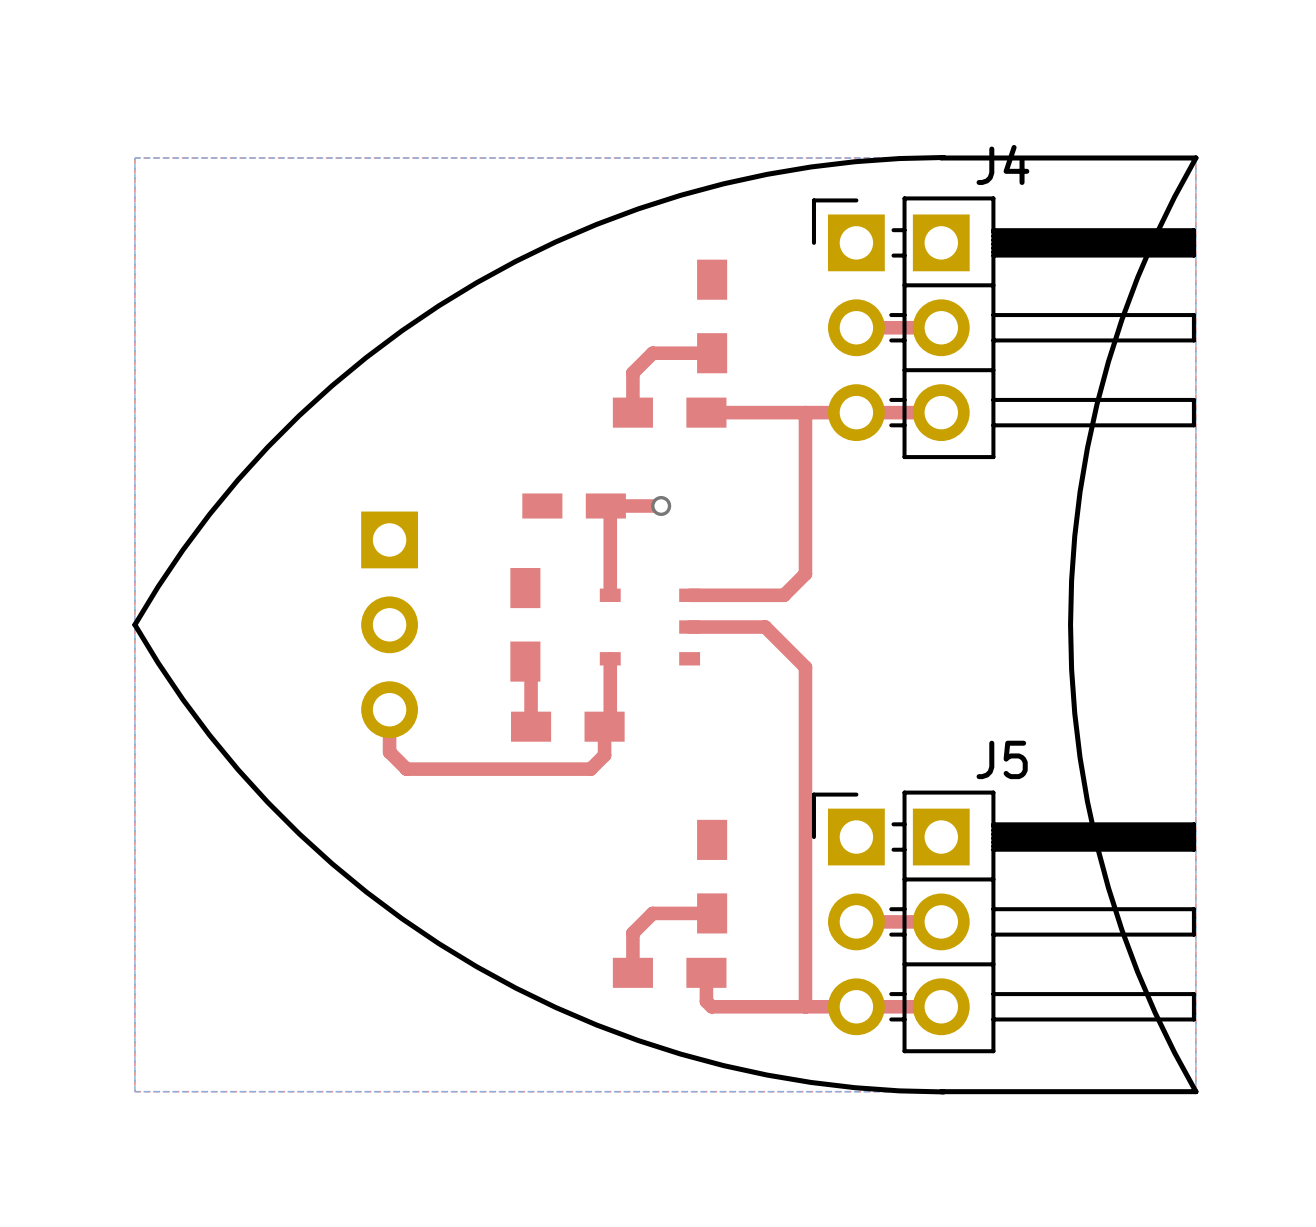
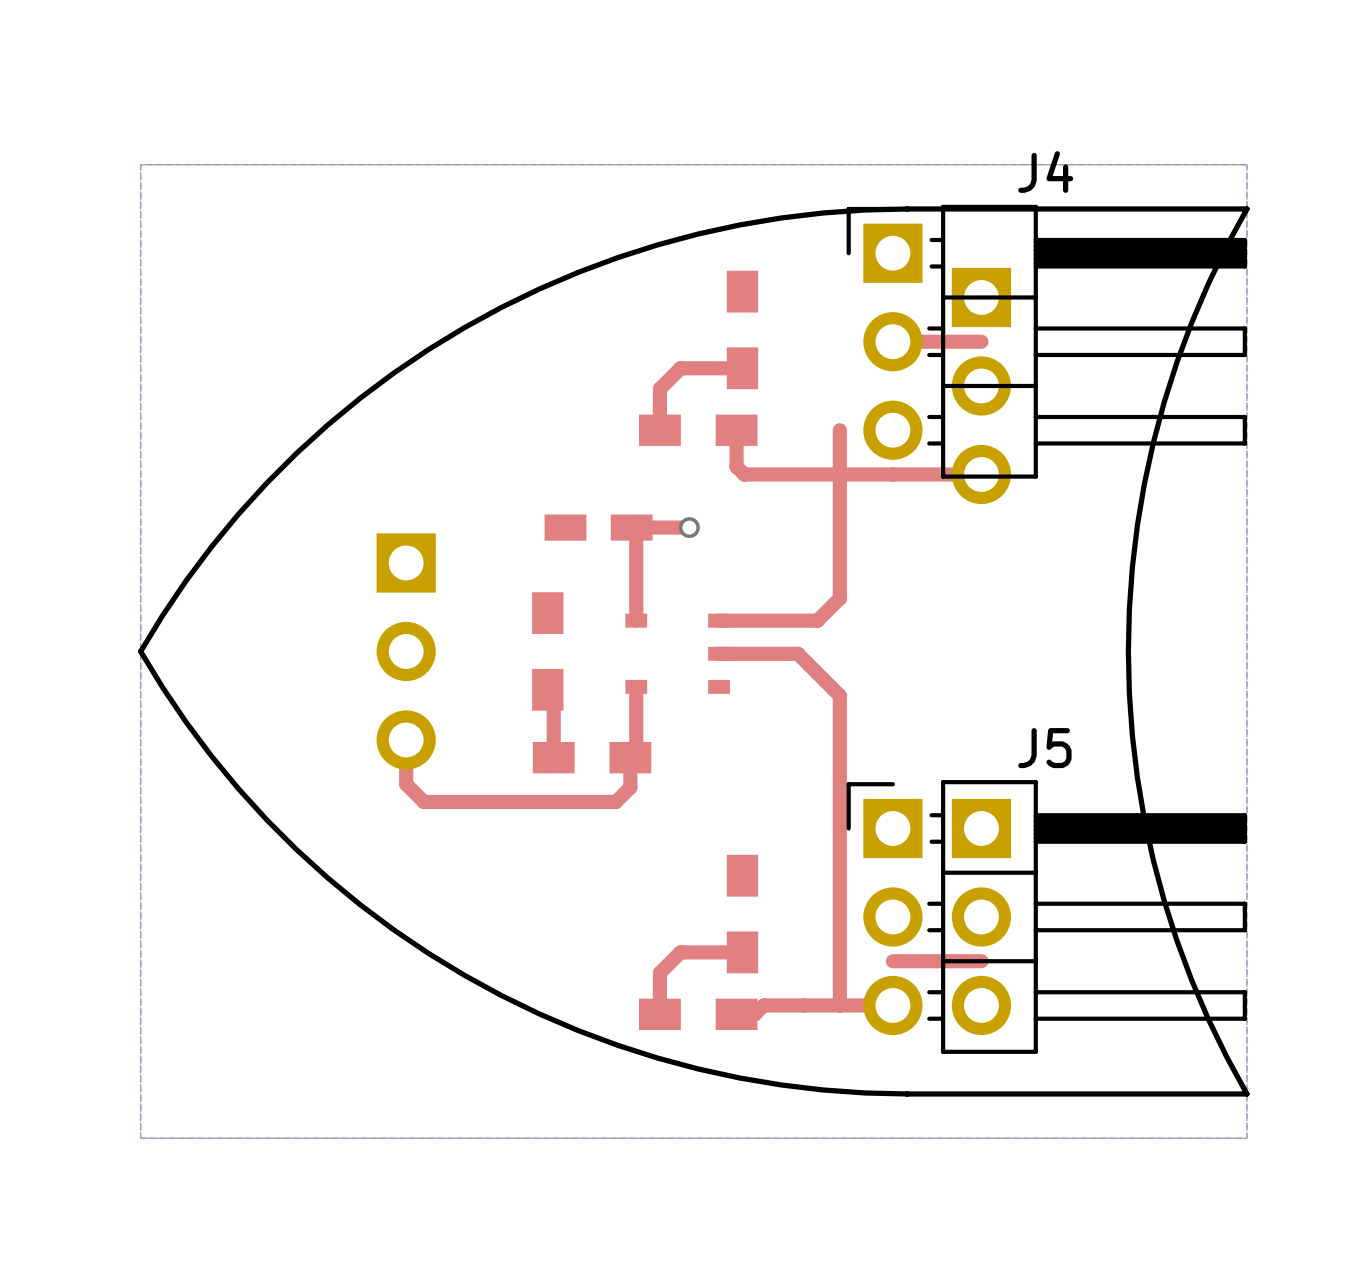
board edge: (941, 157) (1195, 157) (1174, 196) (1137, 277) (1108, 361) (1096, 404) (1080, 491) (1071, 580) (1070, 624) (1071, 669) (1080, 757) (1087, 801) (1108, 887) (1137, 971) (1174, 1052) (1195, 1091) (941, 1091) -> none
board edge: (943, 157) (899, 158) (810, 167) (723, 183) (680, 195) (596, 224) (555, 241) (476, 282) (401, 330) (366, 357) (299, 415) (237, 480) (209, 514) (158, 586) (134, 624) (182, 699) (209, 735) (267, 802) (299, 833) (332, 863) (402, 918) (476, 966) (515, 988) (596, 1025) (680, 1054) (767, 1075) (810, 1082) (855, 1087) (943, 1091) -> none
board edge: none -> (1246, 208) (907, 208) (822, 213) (739, 224) (698, 233) (657, 244) (578, 272) (501, 307) (428, 349) (393, 373) (327, 425) (266, 483) (211, 546) (186, 580) (140, 651) (162, 687) (211, 756) (266, 819) (327, 877) (393, 929) (428, 953) (501, 995) (578, 1030) (657, 1058) (698, 1069) (739, 1077) (822, 1089) (907, 1093) (1246, 1093) (1208, 1019) (1177, 940) (1164, 900) (1153, 860) (1137, 777) (1132, 735) (1128, 651) (1132, 567) (1137, 525) (1144, 483) (1164, 402) (1191, 322) (1226, 245) (1246, 208)
part position: (941, 327) -> (981, 385)
top track: (941, 412) (706, 412) -> (981, 474) (744, 474) (736, 466) (736, 430)
part position: (941, 921) -> (981, 916)
J5 position: (1003, 921) -> (1046, 916)
top track: (805, 964) (805, 1006) -> none
top track: (706, 972) (706, 1001) (711, 1006) (941, 1006) -> (736, 1014) (754, 1014) (763, 1005) (892, 1005)

